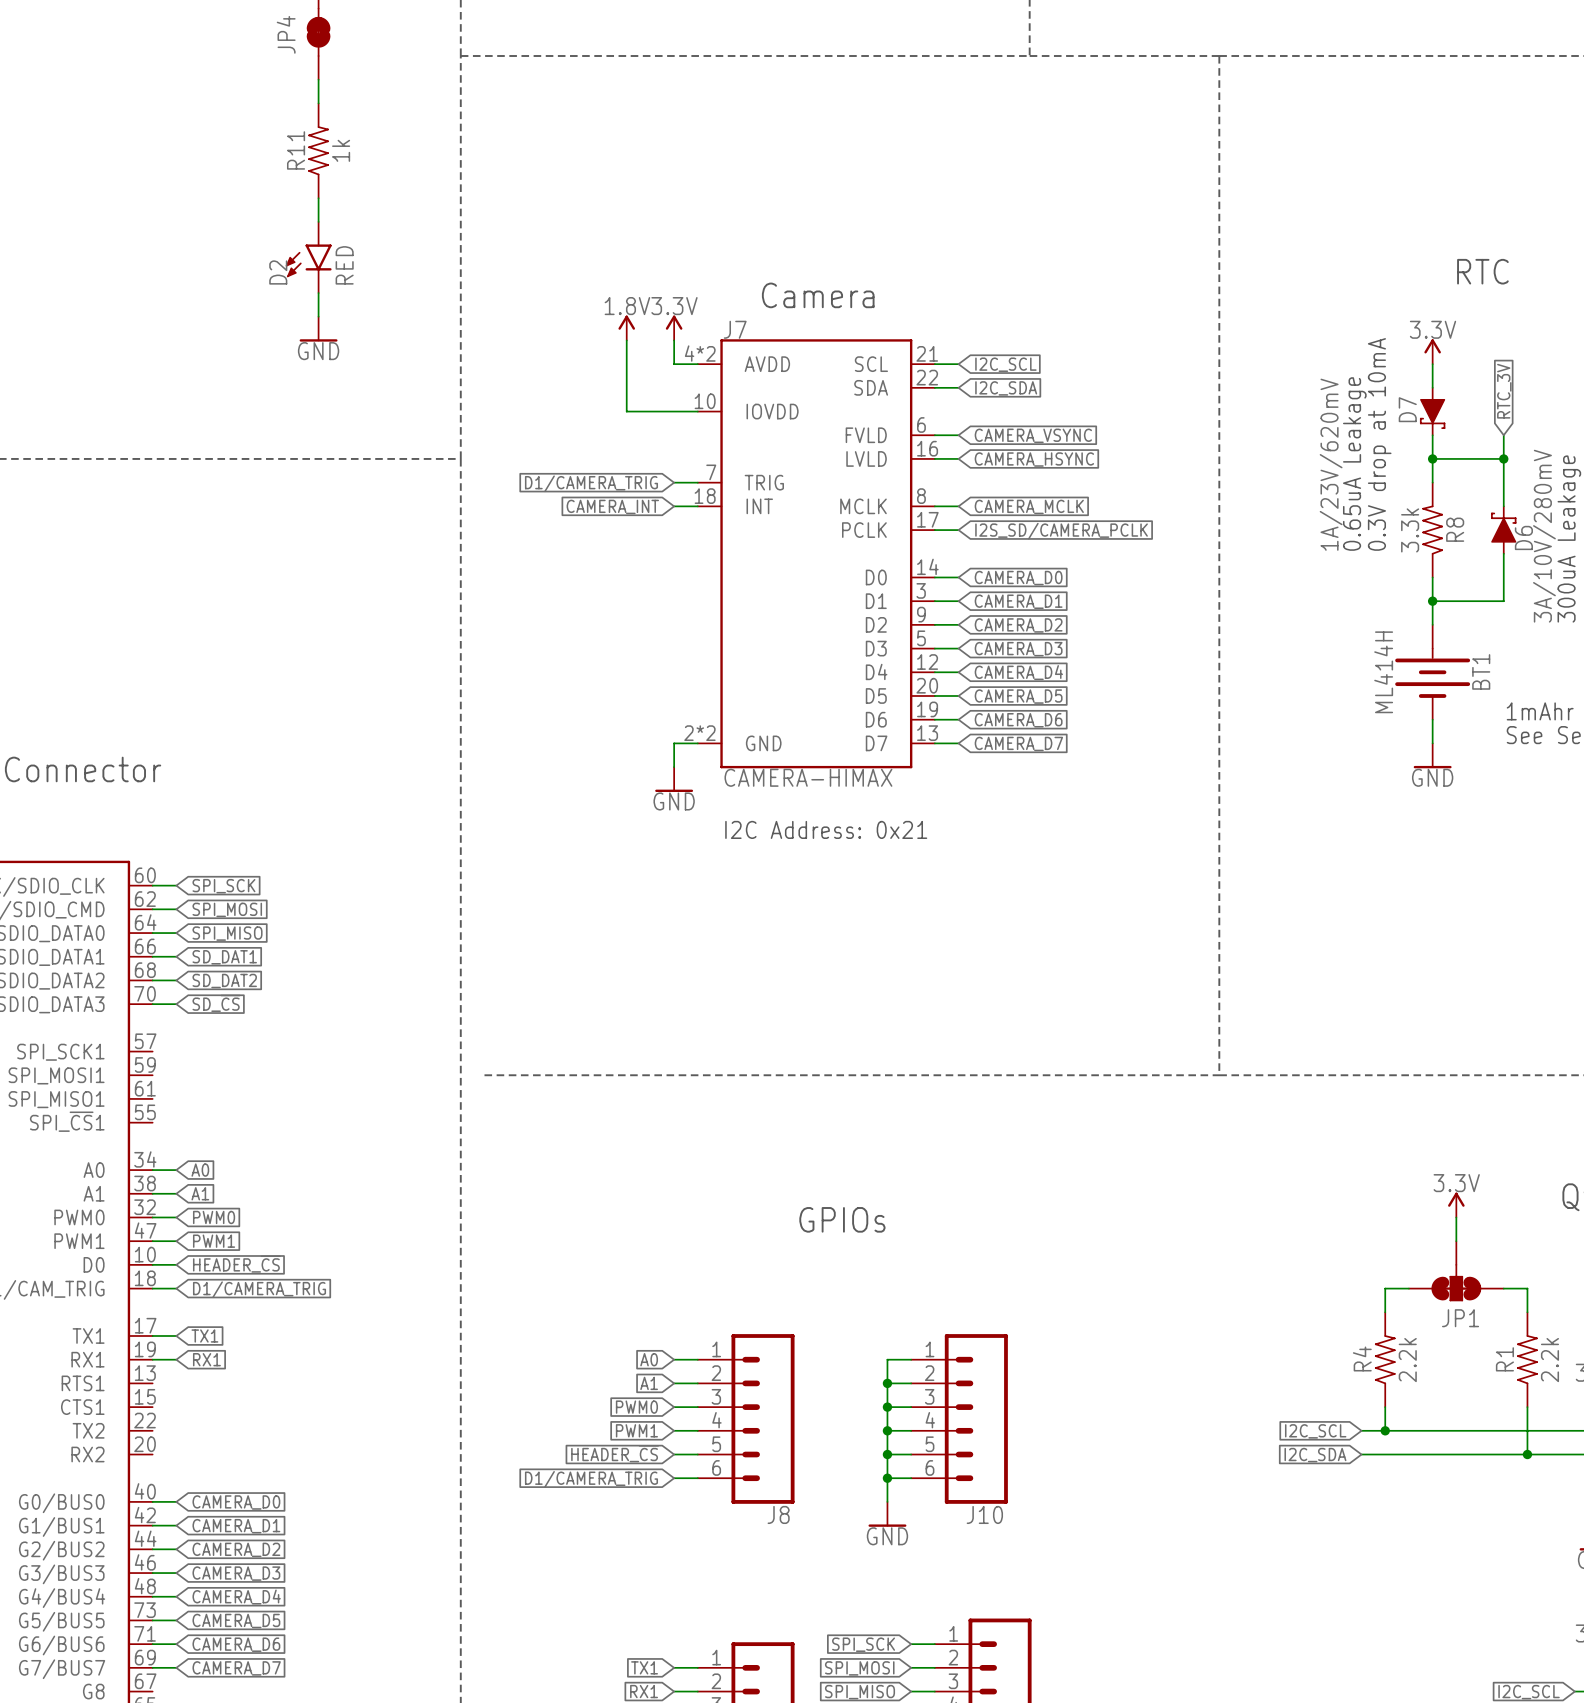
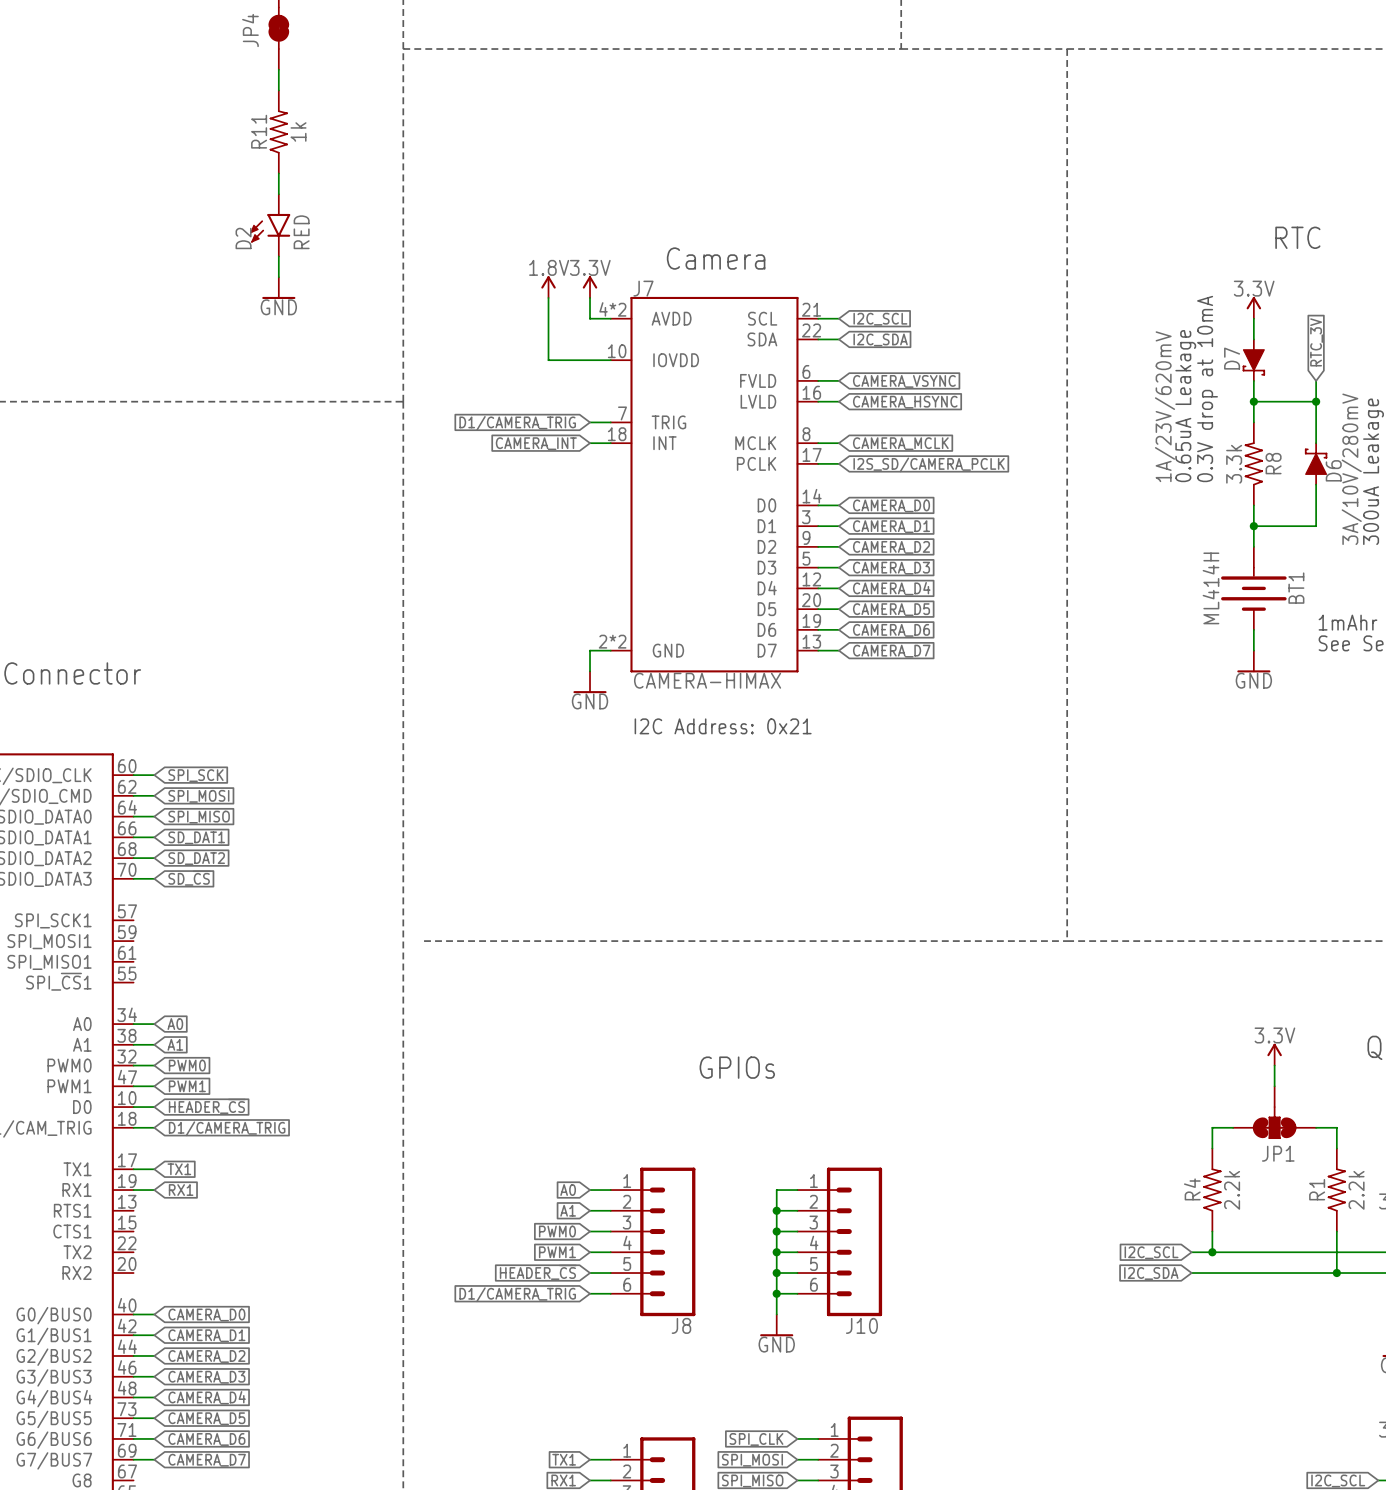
global label: SPI_SCK (863, 1644) -> SPI_CLK (756, 1439)

